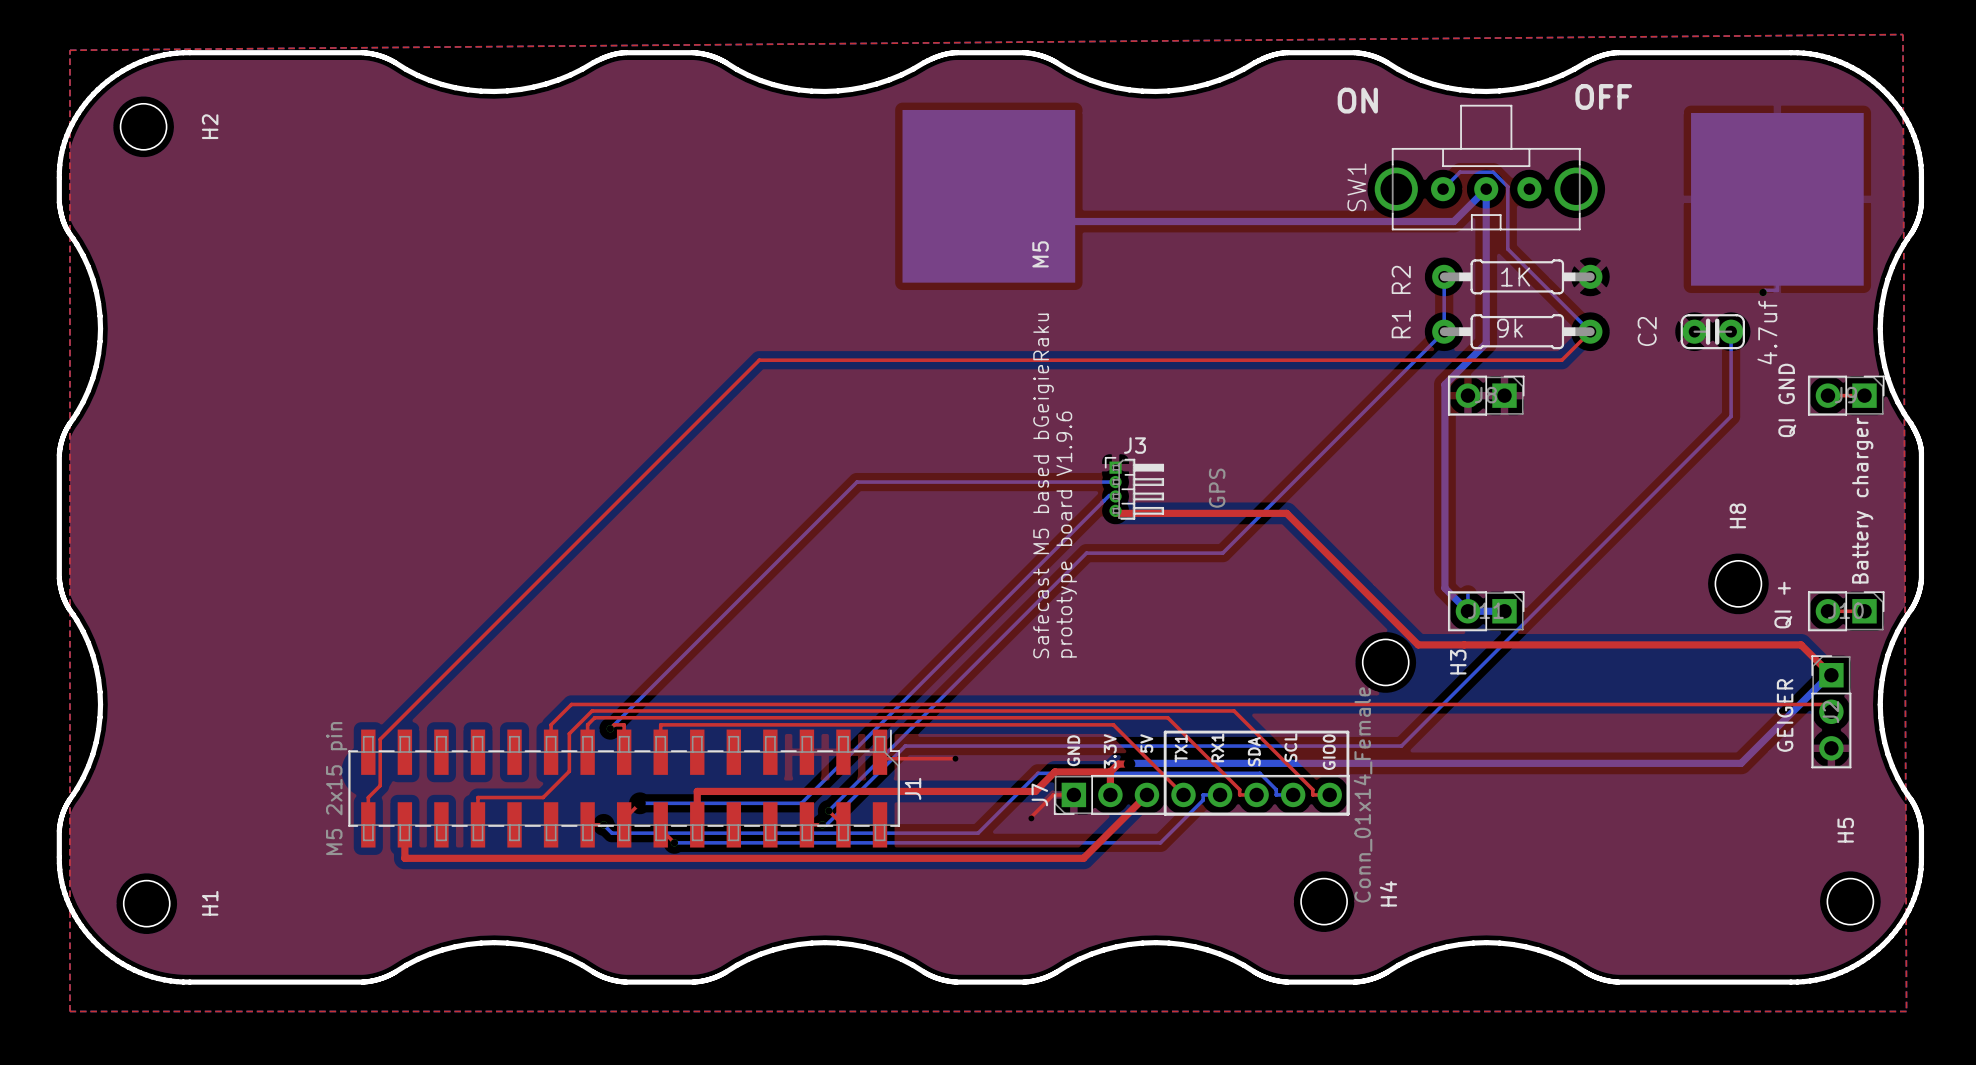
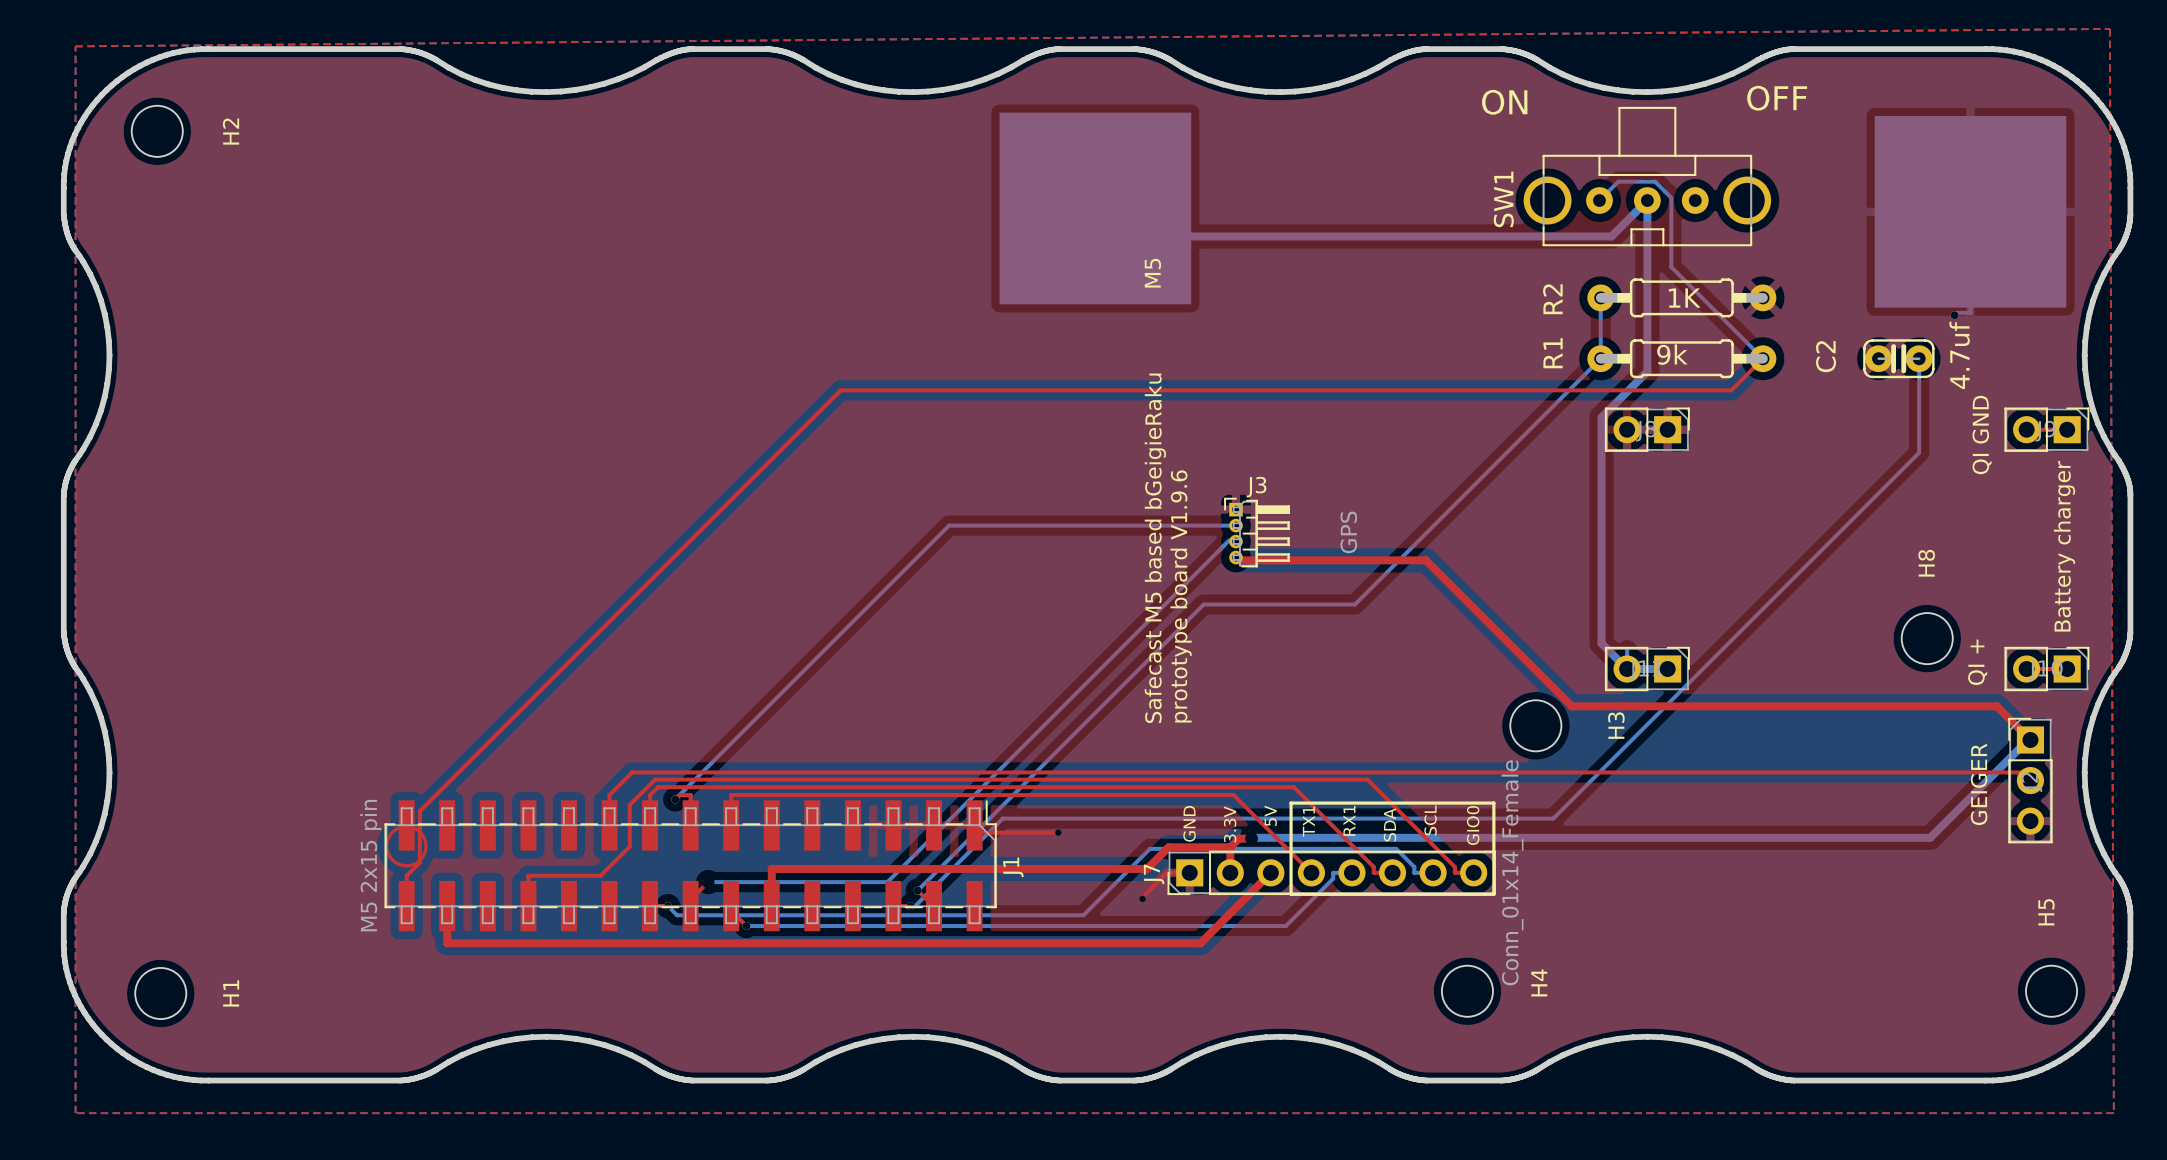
drawing: none -> [385, 825, 428, 868]

